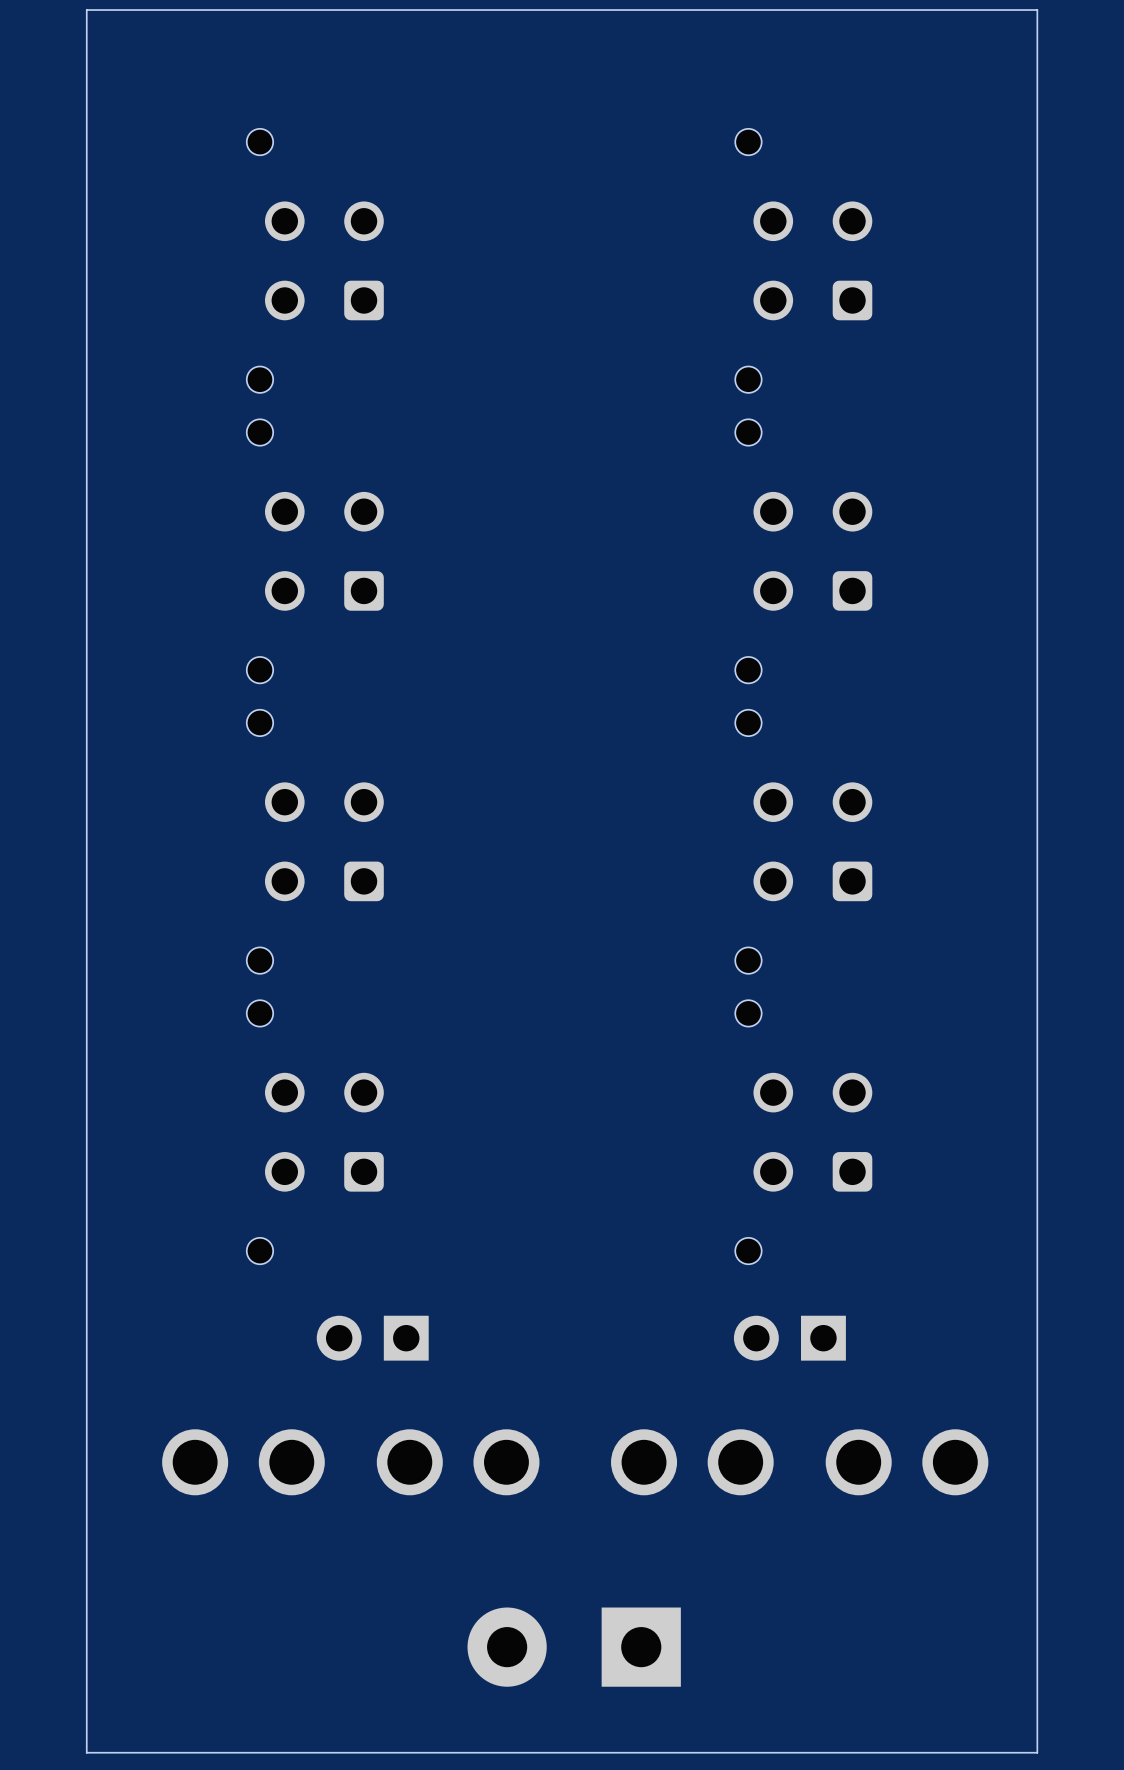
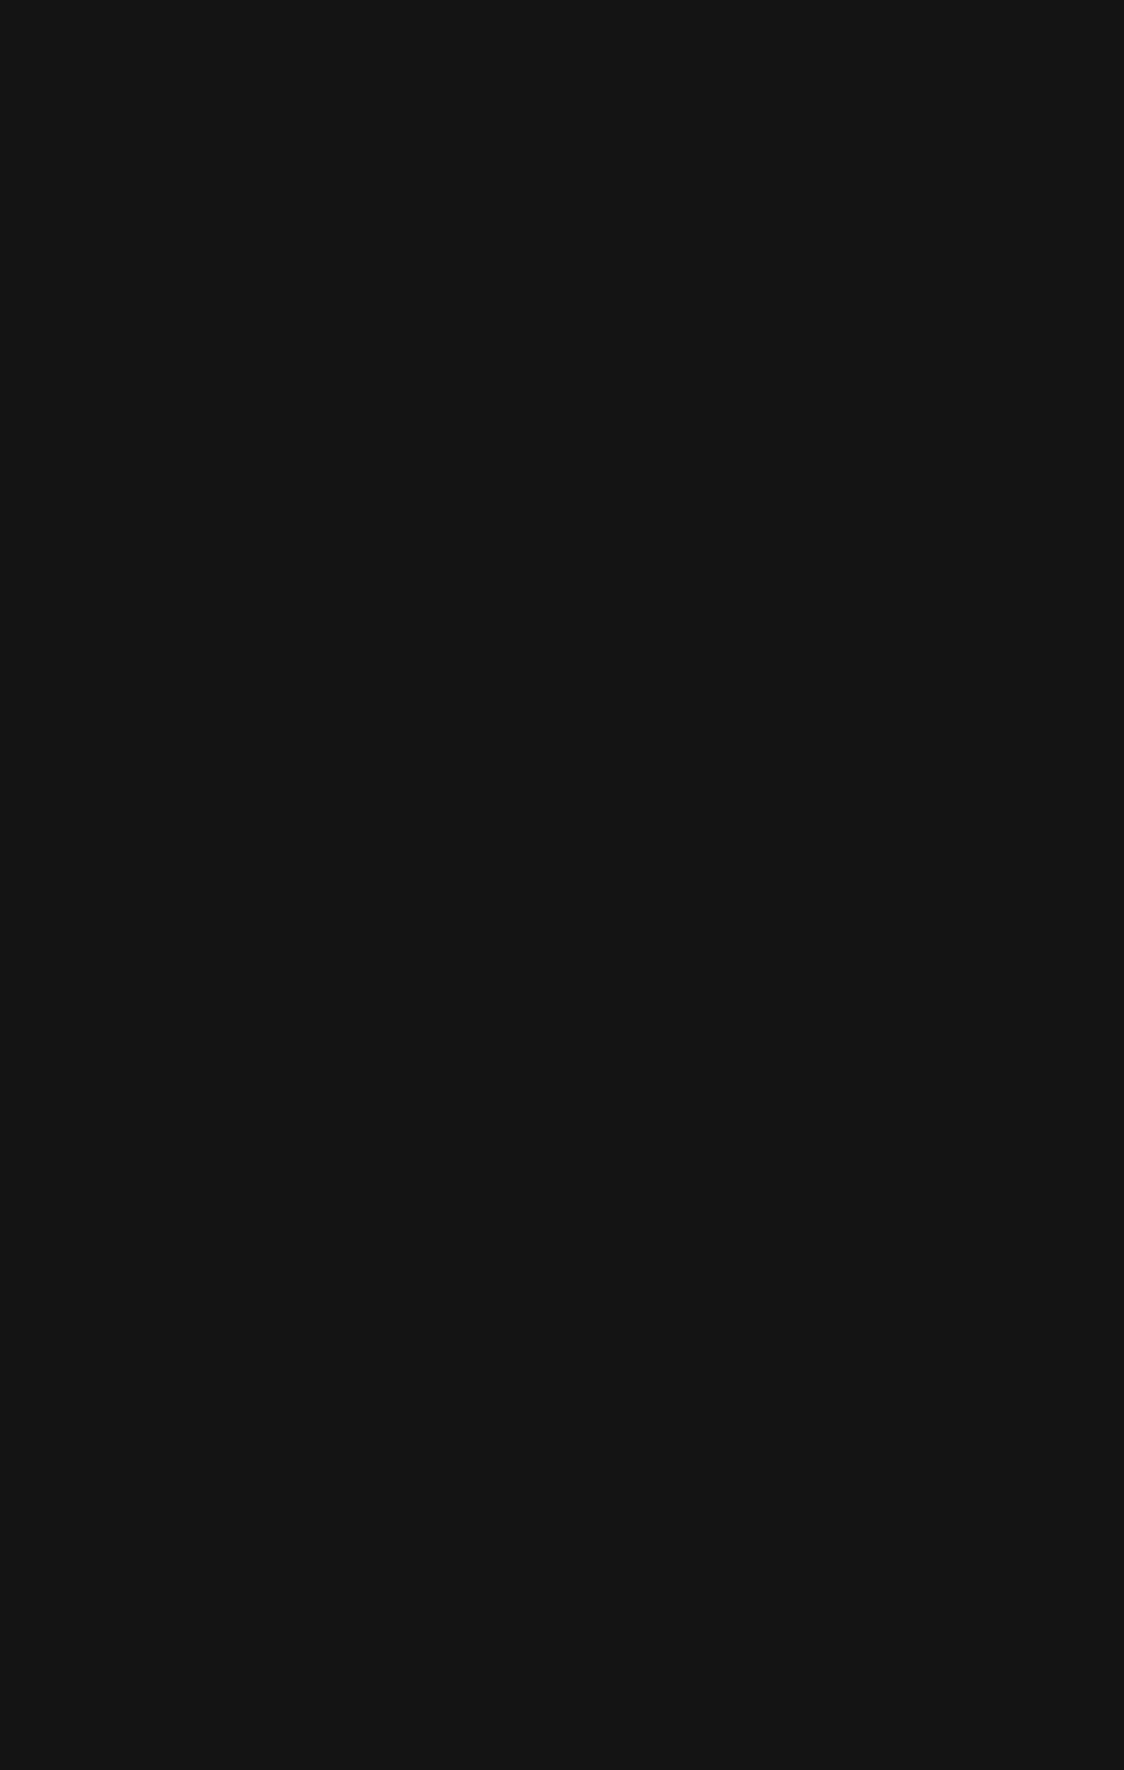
board edge: (1037, 10) (86, 10) (86, 1752) (1037, 1752) (1037, 10) -> none
part: (315, 260) -> none
part: (803, 260) -> none
part: (315, 551) -> none
part: (803, 551) -> none
part: (315, 841) -> none
part: (803, 841) -> none
part: (315, 1132) -> none
part: (803, 1132) -> none
part: (372, 1338) -> none
part: (789, 1338) -> none
part: (350, 1462) -> none
part: (799, 1462) -> none
part: (574, 1647) -> none

